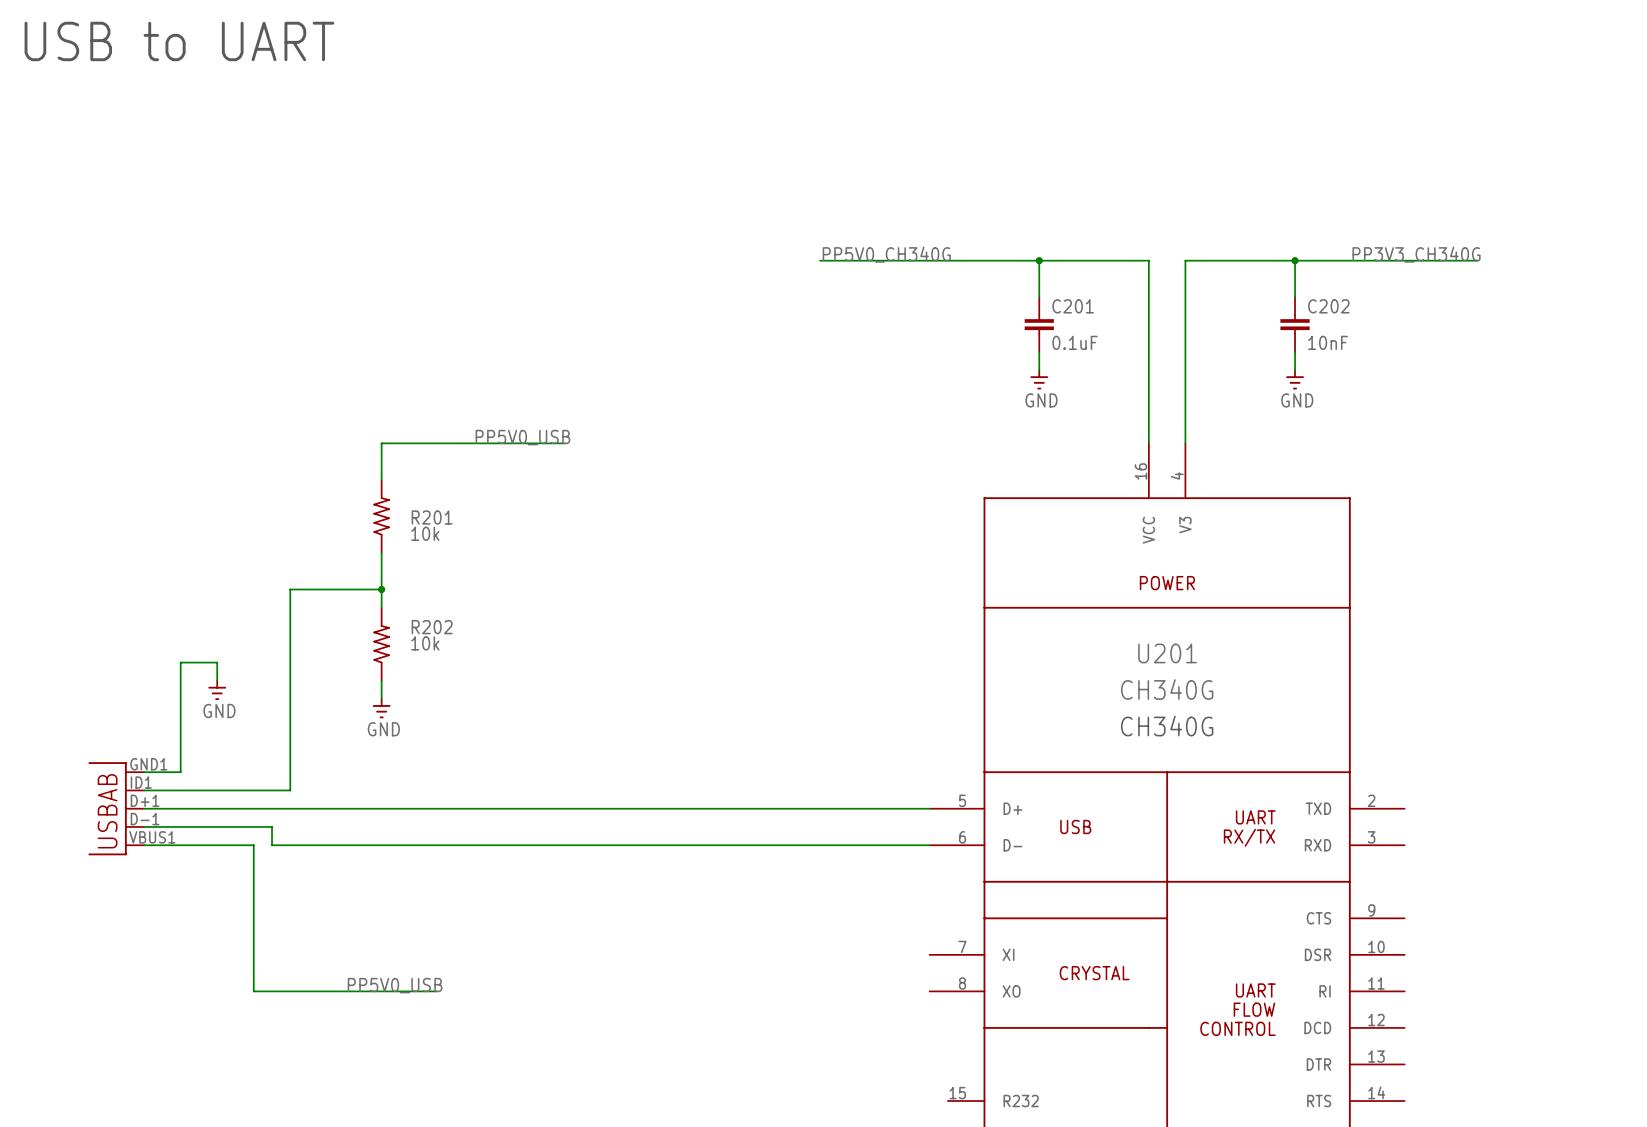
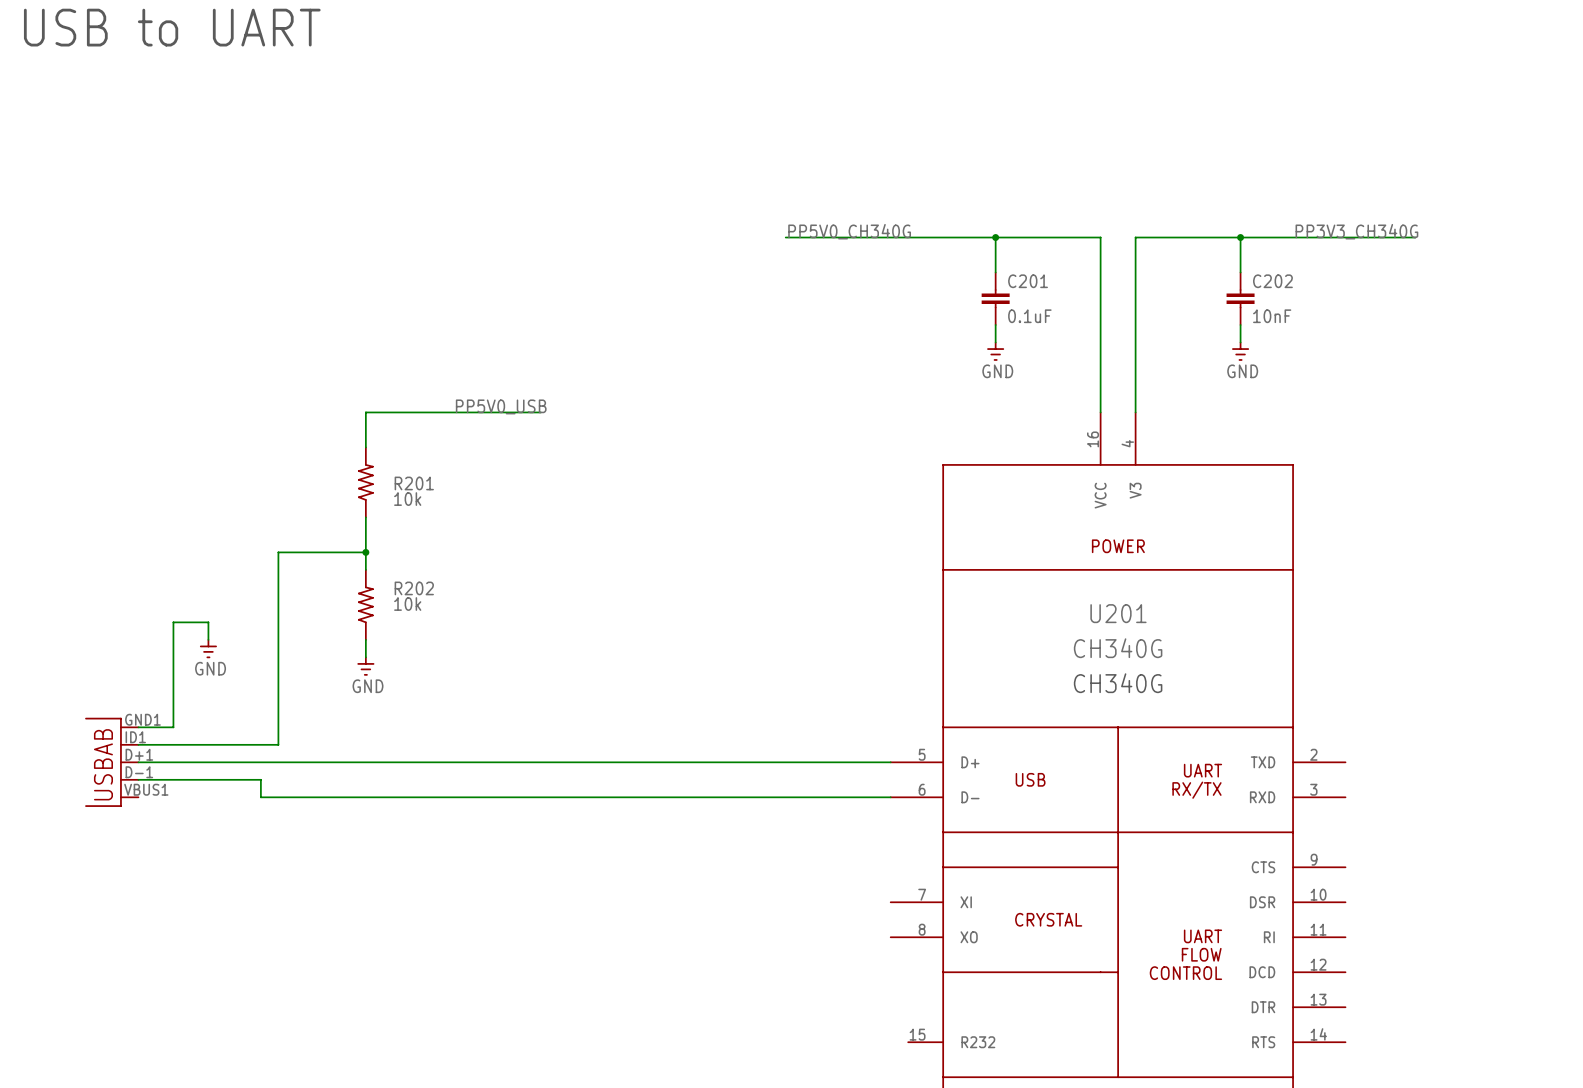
wire: (144, 845) (253, 845) (253, 991) (436, 991) -> none
label: PP5V0_USB (395, 985) -> none

